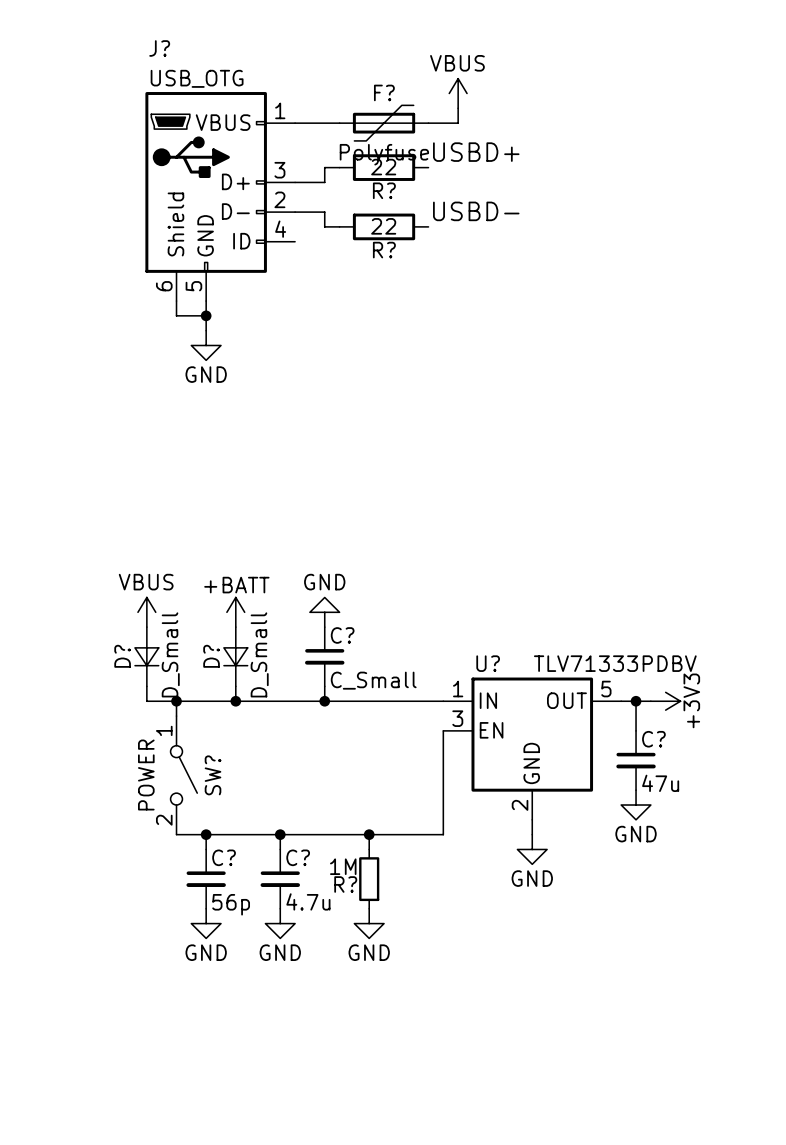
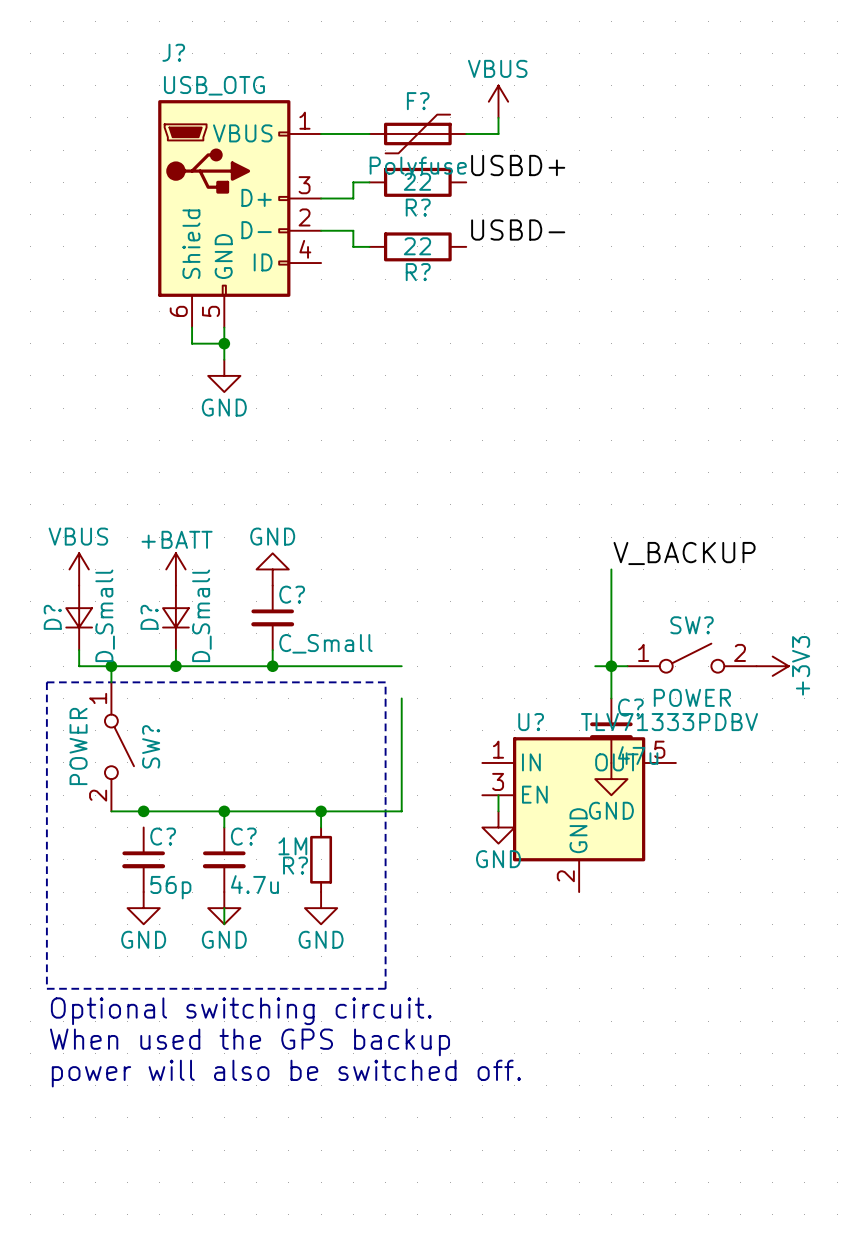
label: none -> V_BACKUP (684, 553)
power symbol: none -> GND (272, 569)
wire: none -> (611, 569) (611, 698)
D?: none -> D_Small (79, 617)
D?: none -> D_Small (175, 617)
SW?: none -> POWER (692, 658)
junction: none -> (111, 666)
power symbol position: VBUS (146, 612) -> VBUS (79, 569)
junction: none -> (175, 666)
power symbol position: +BATT (235, 612) -> +BATT (175, 569)
junction: none -> (272, 666)
power symbol: GND (324, 612) -> none
junction: none -> (611, 666)
line: none -> (46, 682) (46, 988) (385, 988) (385, 682) (46, 682)
D?: D_Small (146, 656) -> none
D?: D_Small (235, 656) -> none
C? position: (324, 656) -> (272, 617)
wire: (146, 686) (146, 701) (443, 701) -> (79, 650) (79, 666) (401, 666)
wire: (235, 686) (235, 701) -> (175, 650) (175, 666)
wire: (324, 686) (324, 701) -> (272, 650) (272, 666)
wire: (176, 701) (176, 716) -> (111, 666) (111, 682)
junction: (176, 701) -> none
junction: (235, 701) -> none
junction: (324, 701) -> none
wire: (621, 701) (650, 701) -> (595, 666) (627, 666)
wire: (636, 701) (636, 730) -> none
junction: (636, 701) -> none
power symbol position: +3V3 (665, 701) -> +3V3 (772, 666)
power symbol: none -> GND (611, 779)
wire: (443, 730) (443, 834) (176, 834) -> (401, 698) (401, 811) (111, 811)
junction: none -> (143, 811)
junction: none -> (224, 811)
junction: none -> (321, 811)
power symbol: none -> GND (498, 827)
C? position: (636, 760) -> (611, 730)
SW? position: (183, 775) -> (119, 746)
power symbol: GND (636, 805) -> none
wire: (532, 819) (532, 834) -> (498, 795) (498, 811)
power symbol: none -> GND (143, 908)
power symbol: none -> GND (224, 908)
junction: (206, 834) -> none
wire: (280, 834) (280, 849) -> (224, 811) (224, 827)
junction: (280, 834) -> none
power symbol: none -> GND (321, 908)
wire: (369, 834) (369, 849) -> (321, 811) (321, 827)
junction: (369, 834) -> none
power symbol: GND (532, 849) -> none
C? position: (206, 879) -> (143, 859)
C? position: (280, 879) -> (224, 859)
R? position: (369, 879) -> (321, 859)
power symbol: GND (206, 923) -> none
power symbol: GND (280, 923) -> none
power symbol: GND (369, 923) -> none
text: none -> Optional switching circuit. (241, 1011)
text: none -> When used the GPS backup (250, 1042)
text: none -> power will also be switched off. (286, 1073)

